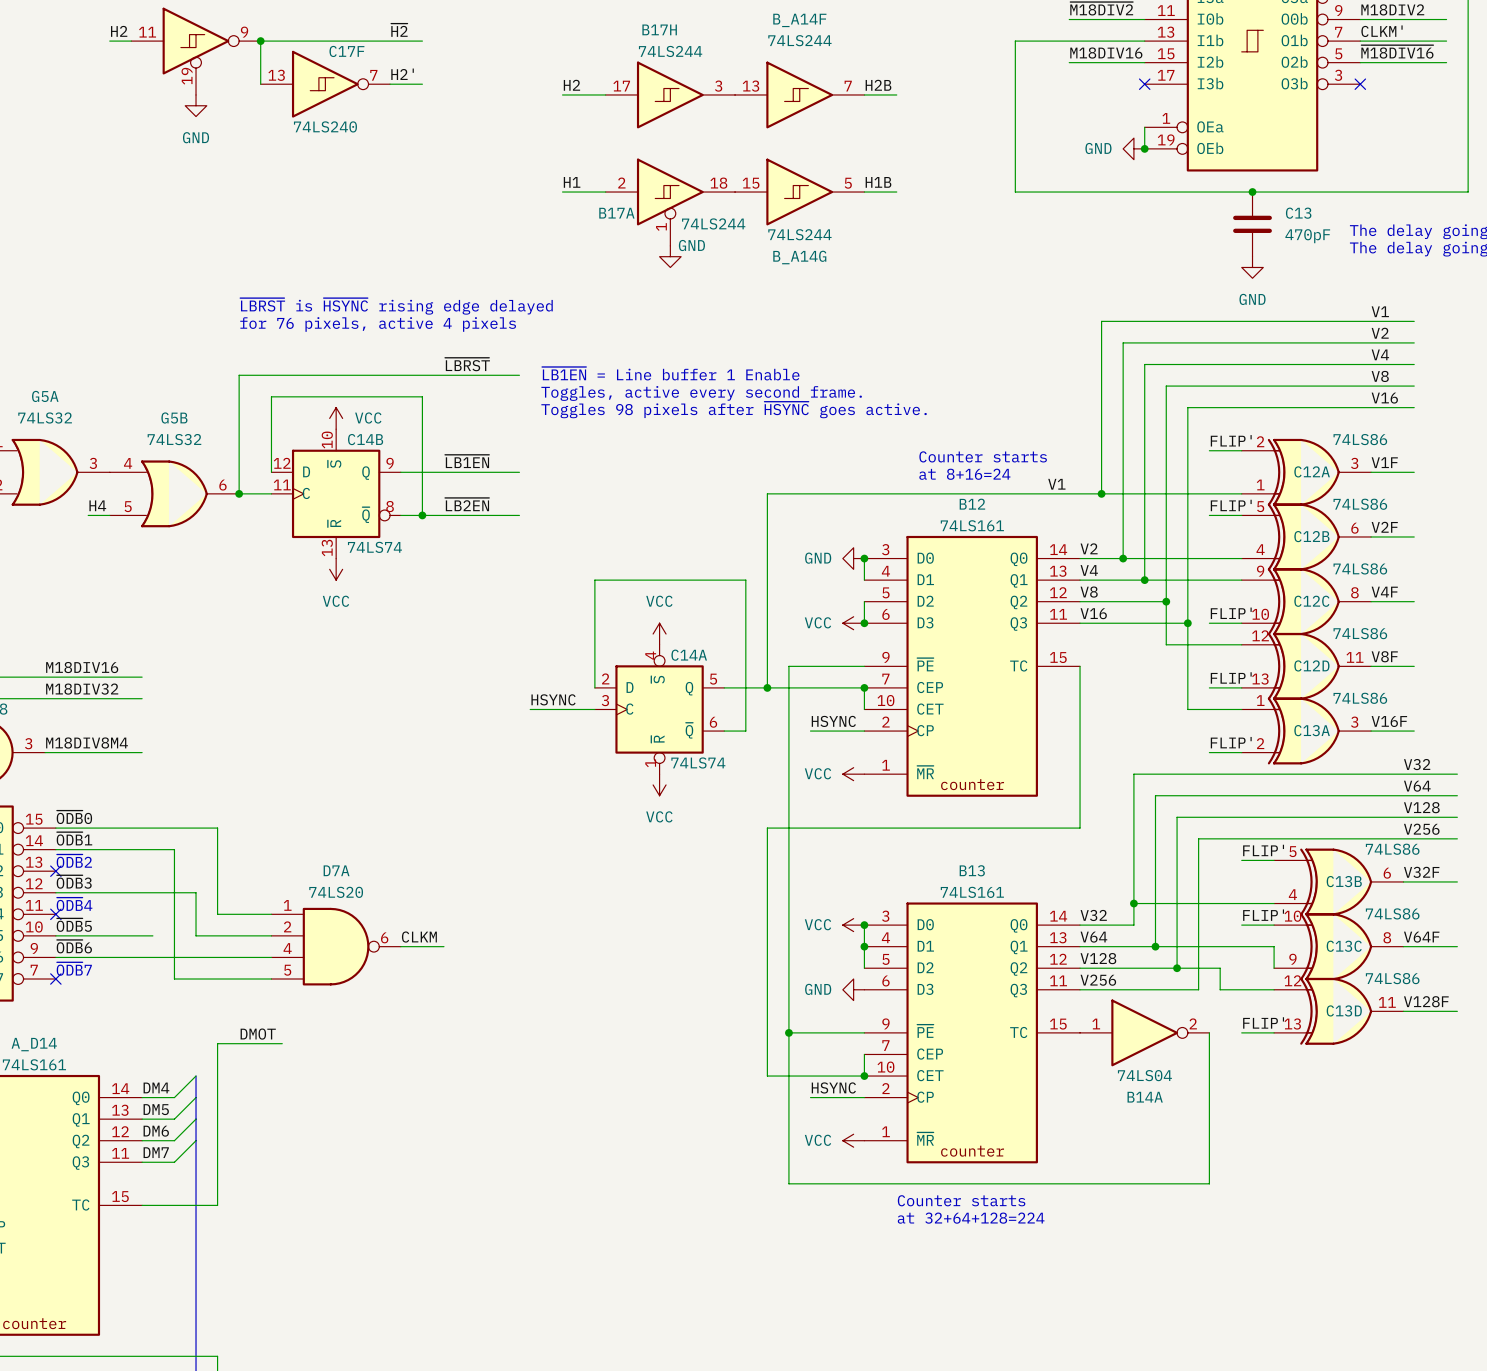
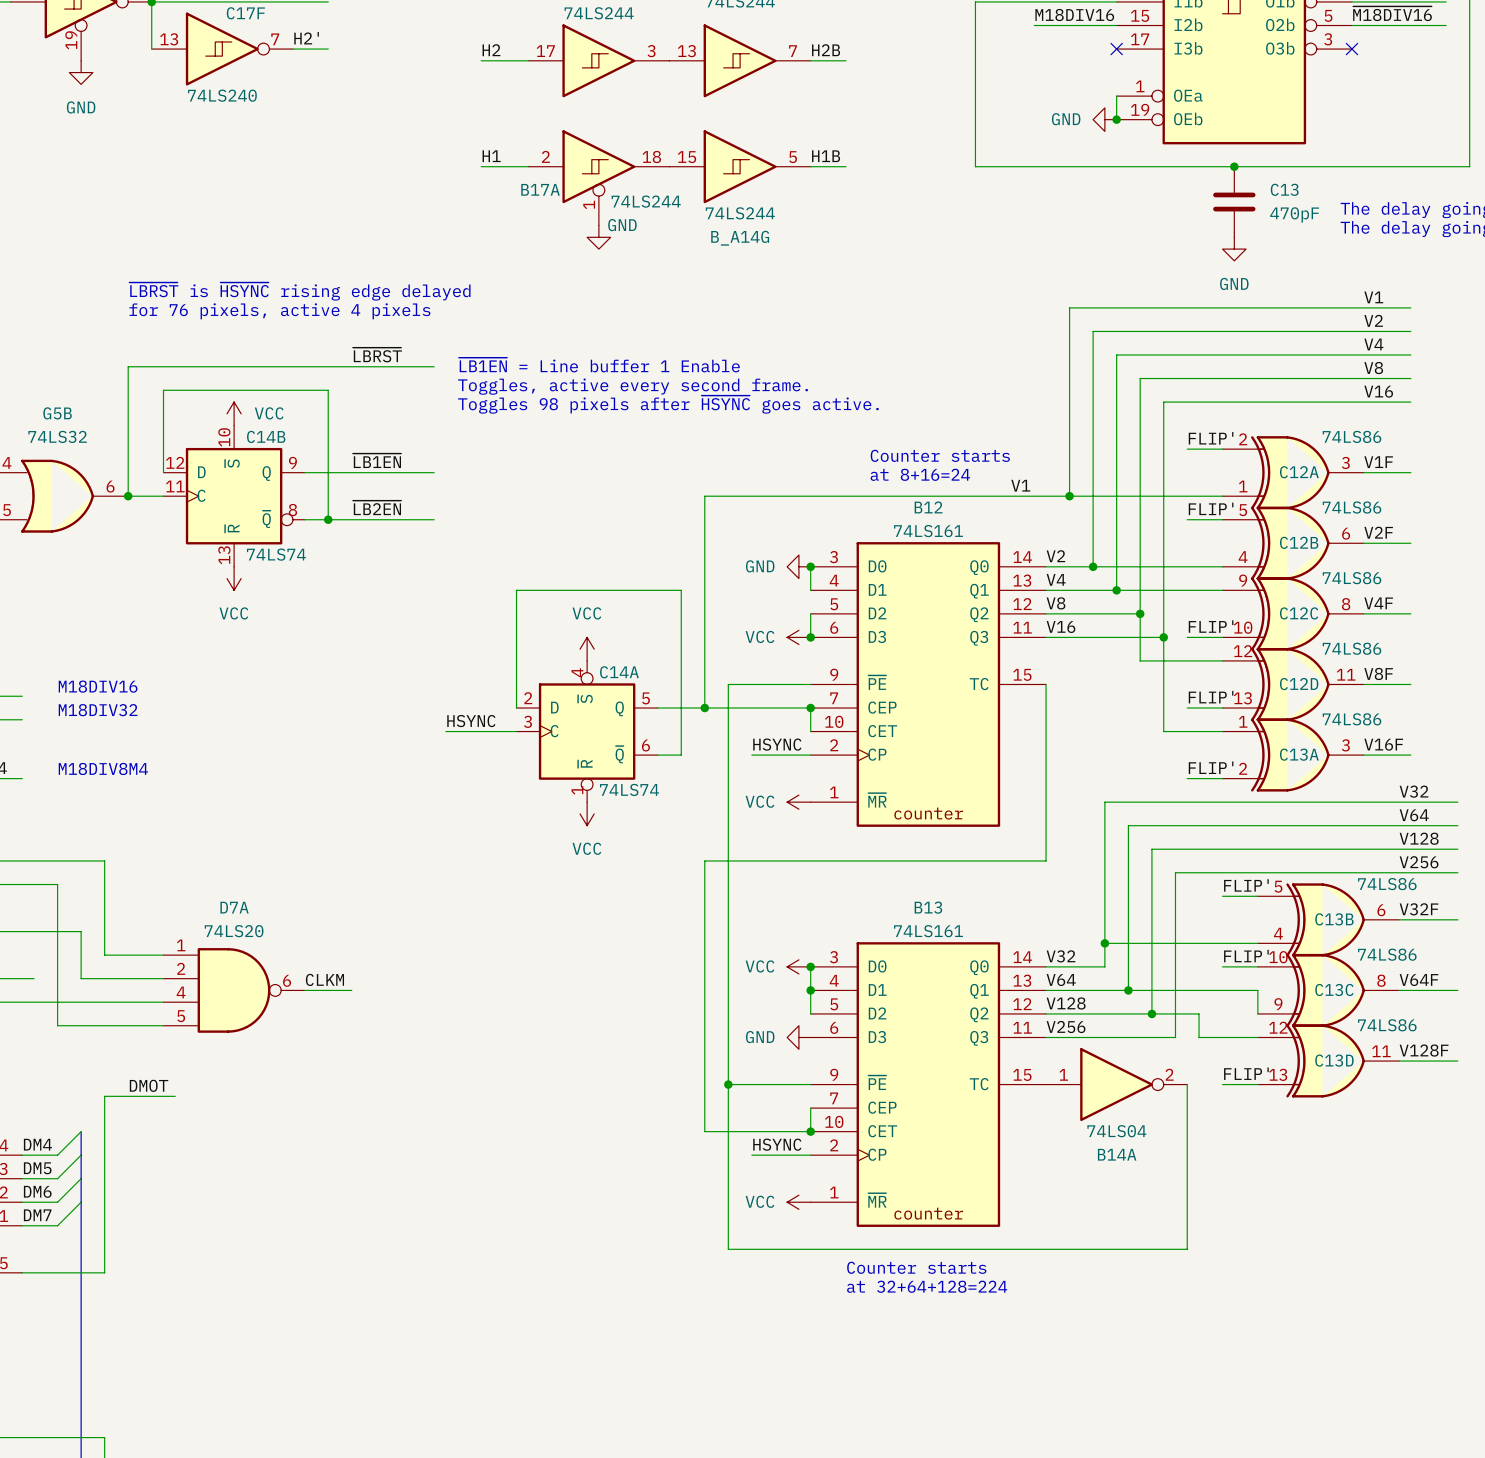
text: none -> M18DIV16 (98, 686)
text: none -> M18DIV32 (98, 710)
text: none -> M18DIV8M4 (103, 768)

